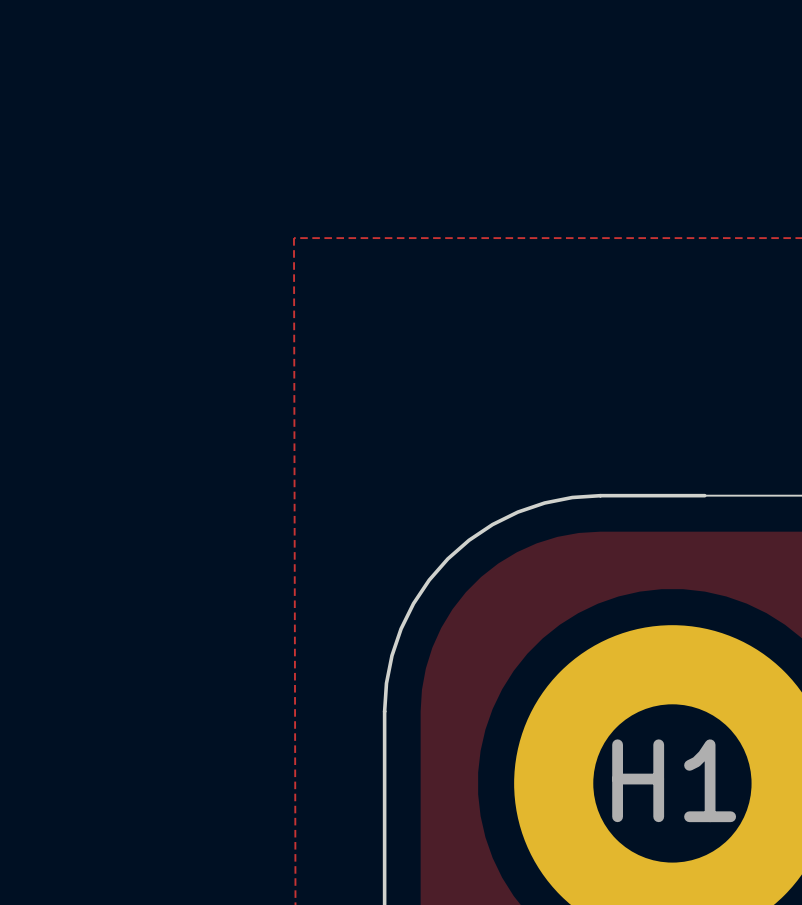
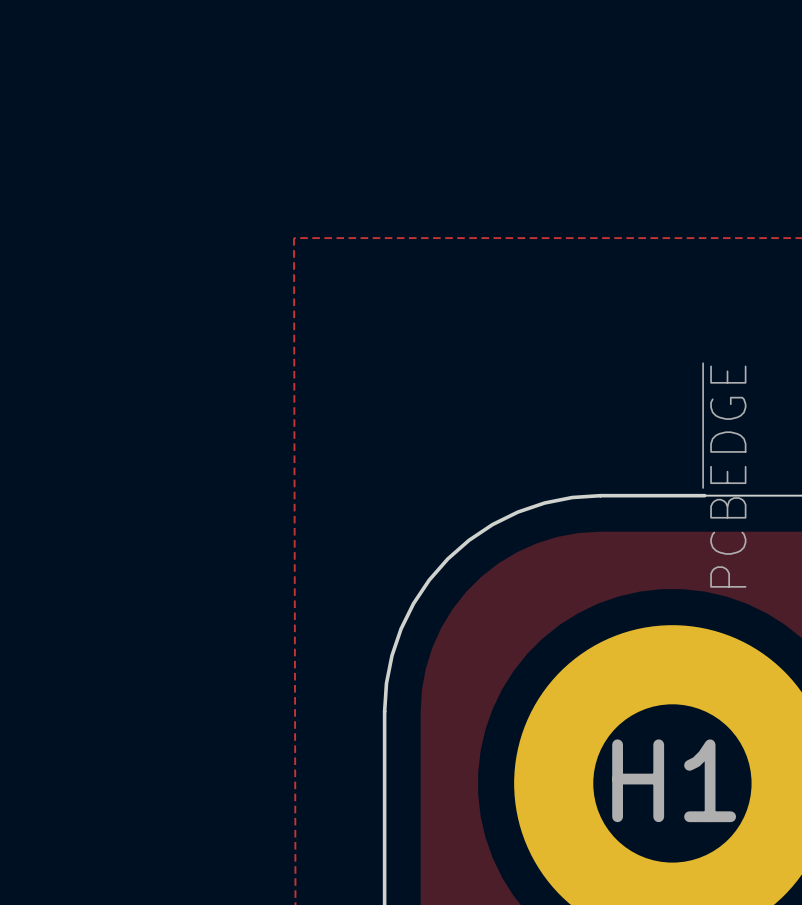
part text: none -> PCB~{EDGE} (724, 475)

